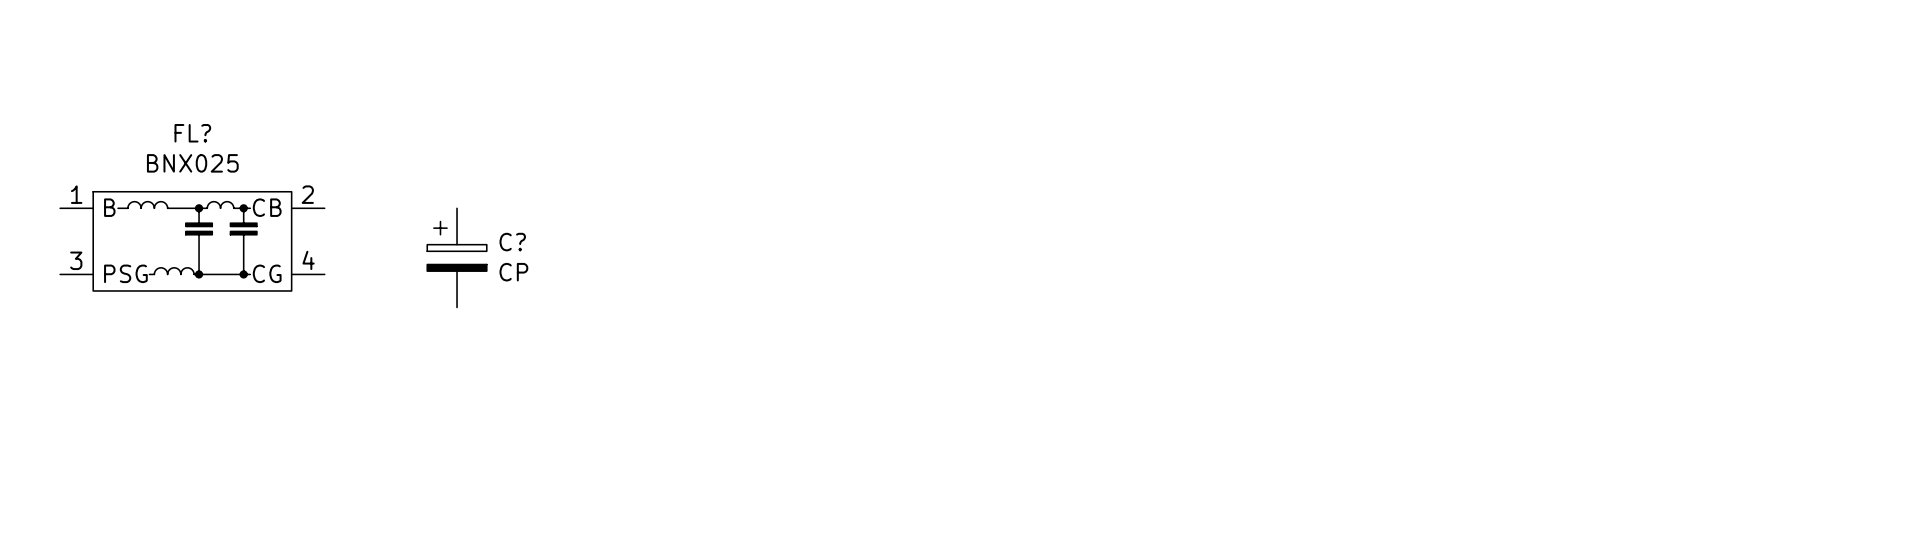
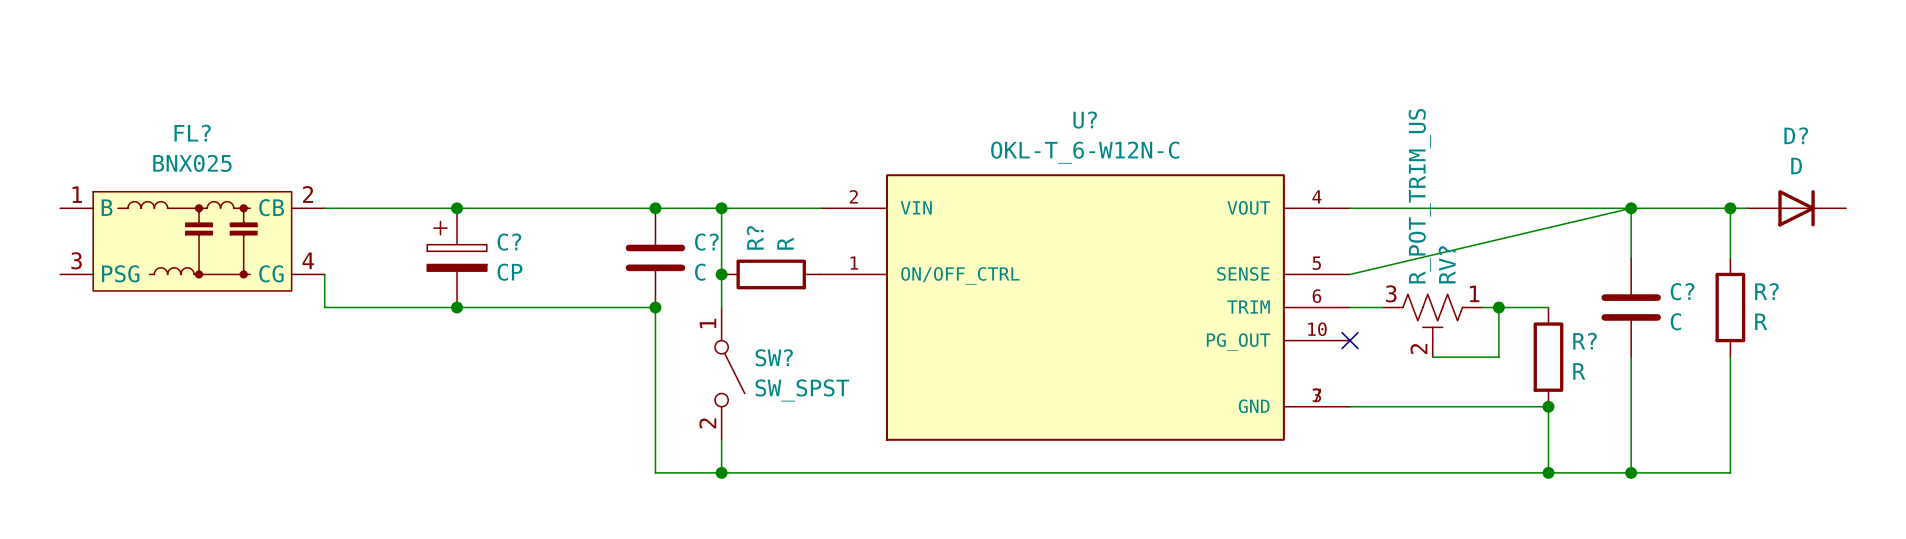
wire: none -> (324, 208) (820, 208)
junction: none -> (457, 208)
junction: none -> (655, 208)
wire: none -> (721, 208) (721, 307)
junction: none -> (721, 208)
wire: none -> (1350, 208) (1746, 208)
junction: none -> (1631, 208)
wire: none -> (1730, 208) (1730, 257)
junction: none -> (1730, 208)
D?: none -> D (1796, 208)
C?: none -> C (655, 257)
wire: none -> (1631, 257) (1631, 208) (1350, 274)
wire: none -> (324, 274) (324, 307) (655, 307) (655, 472) (1730, 472) (1730, 357)
junction: none -> (721, 274)
R?: none -> R (771, 274)
junction: none -> (457, 307)
junction: none -> (655, 307)
U?: none -> OKL-T_6-W12N-C (1085, 307)
wire: none -> (1350, 307) (1383, 307)
wire: none -> (1482, 307) (1548, 307)
wire: none -> (1498, 307) (1498, 357) (1432, 357)
junction: none -> (1498, 307)
C?: none -> C (1631, 307)
R?: none -> R (1730, 307)
RV?: none -> R_POT_TRIM_US (1432, 325)
no-connect mark: none -> (1350, 340)
R?: none -> R (1548, 357)
wire: none -> (1631, 357) (1631, 472)
SW?: none -> SW_SPST (729, 373)
wire: none -> (1350, 406) (1548, 406) (1548, 472)
junction: none -> (1548, 406)
wire: none -> (721, 439) (721, 472)
junction: none -> (721, 472)
junction: none -> (1548, 472)
junction: none -> (1631, 472)

